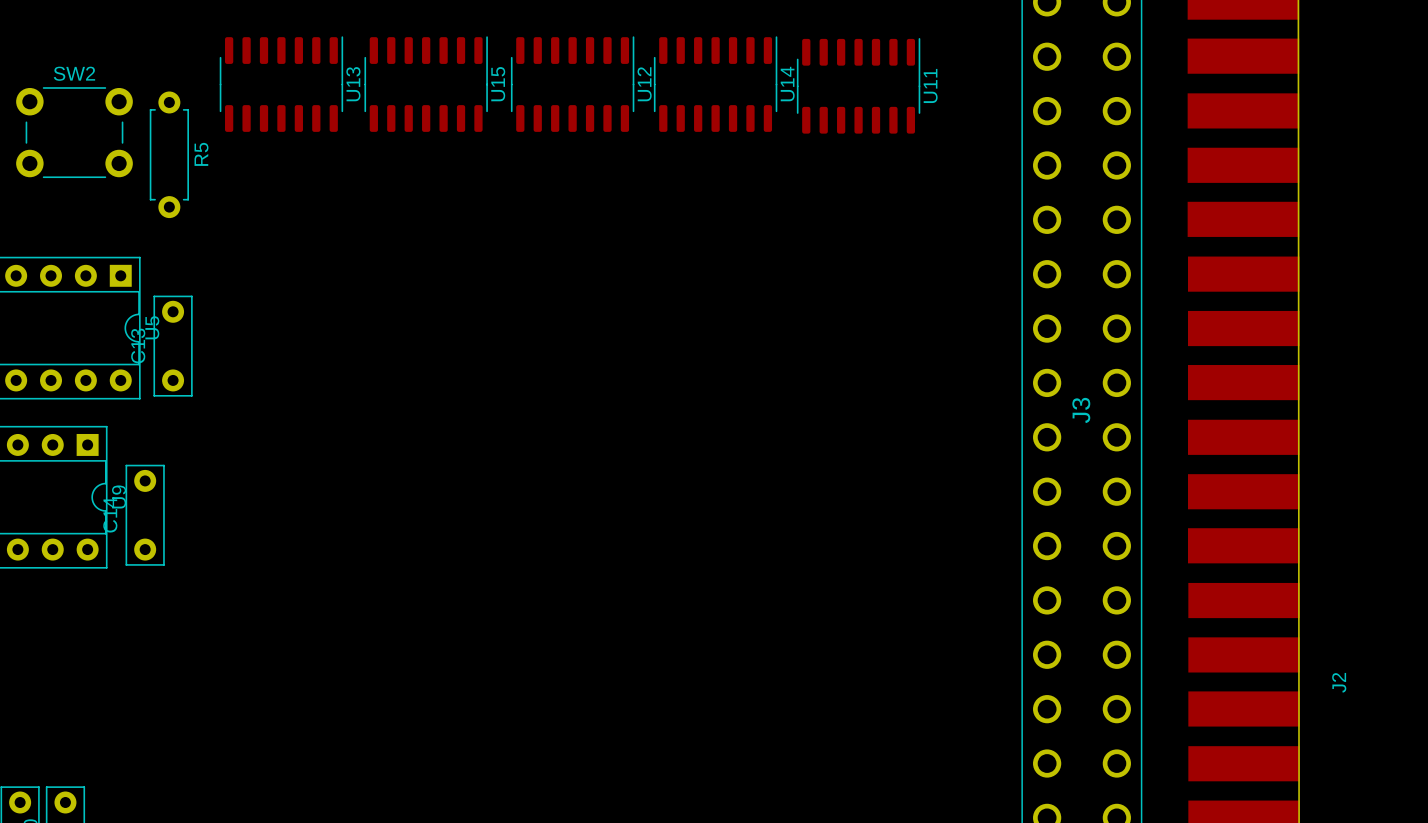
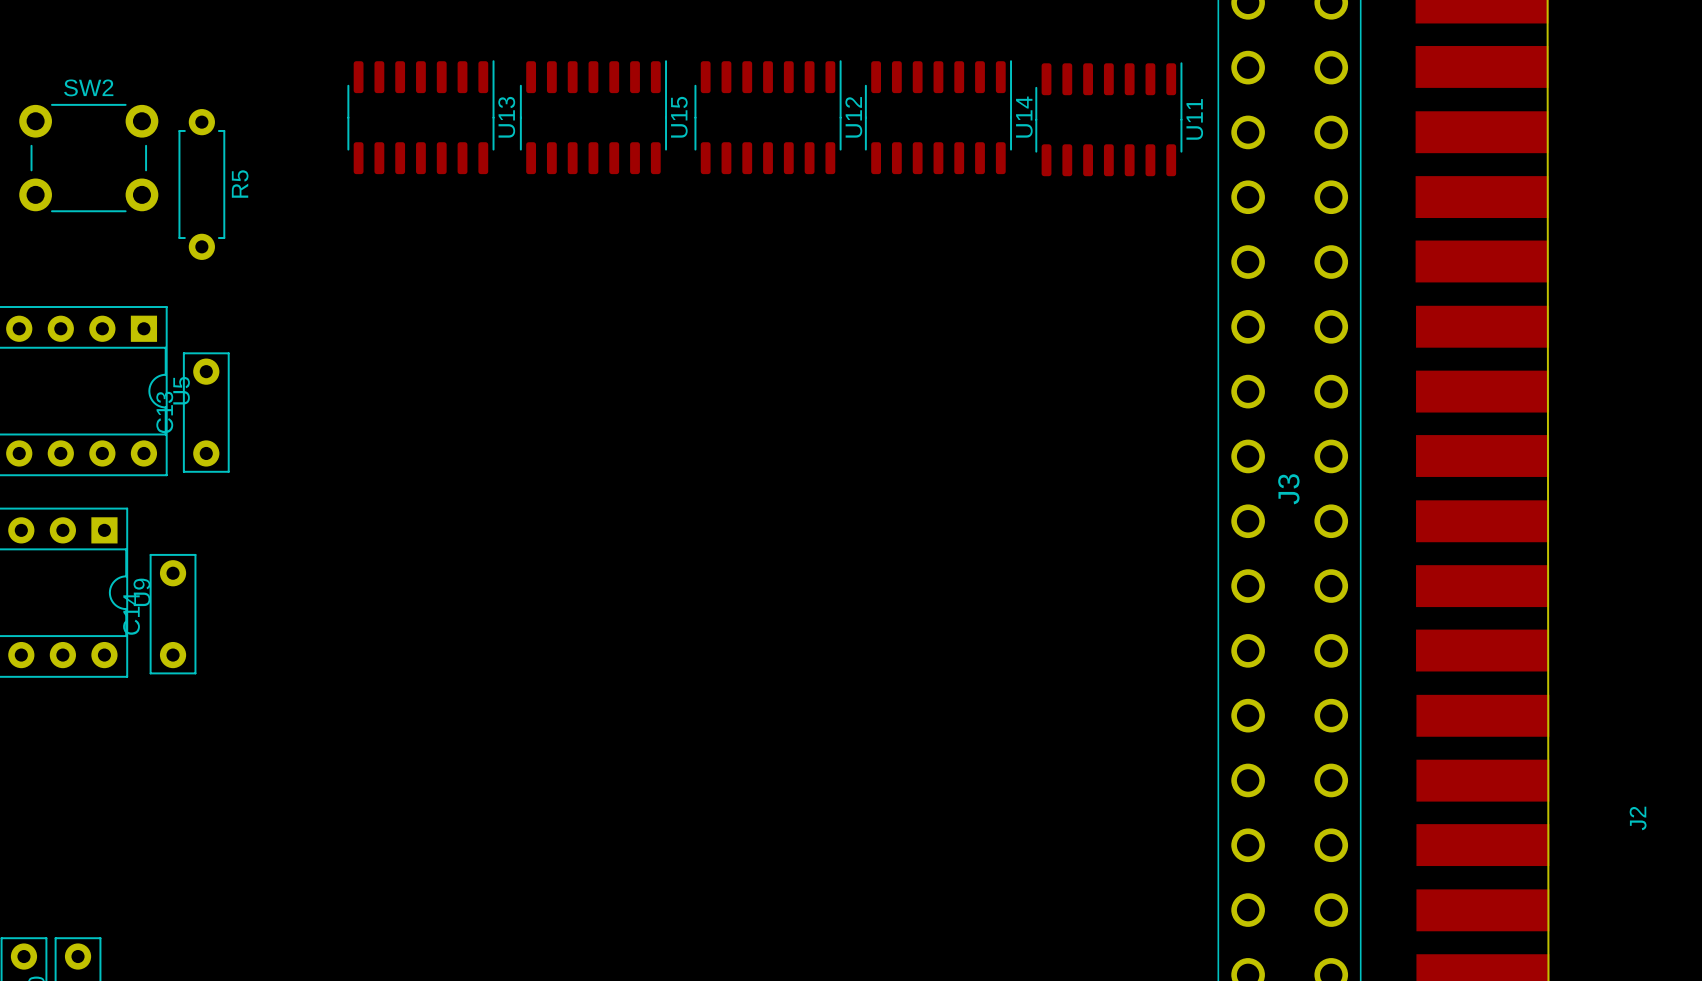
U13 position: (281, 84) -> (420, 117)
U15 position: (426, 84) -> (593, 117)
U12 position: (572, 84) -> (768, 117)
U14 position: (715, 84) -> (938, 117)
U11 position: (858, 85) -> (1108, 119)
J2 name position: J2 (1339, 682) -> J2 (1638, 818)

